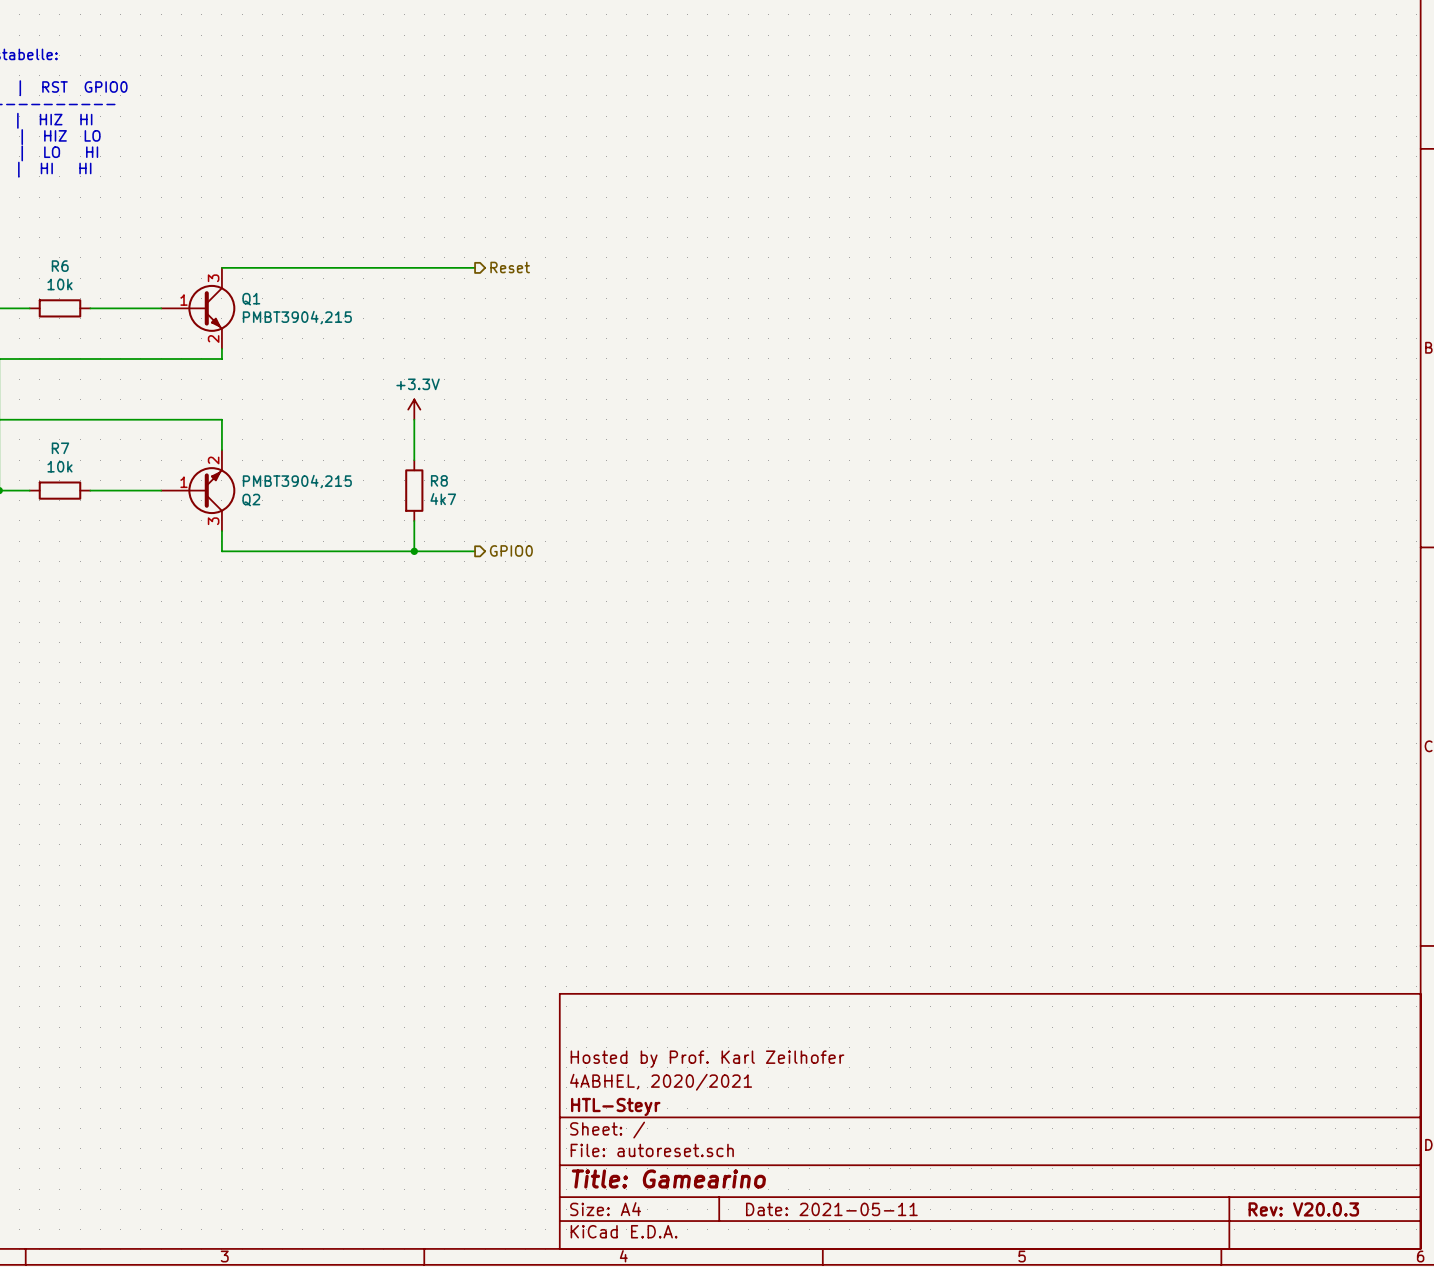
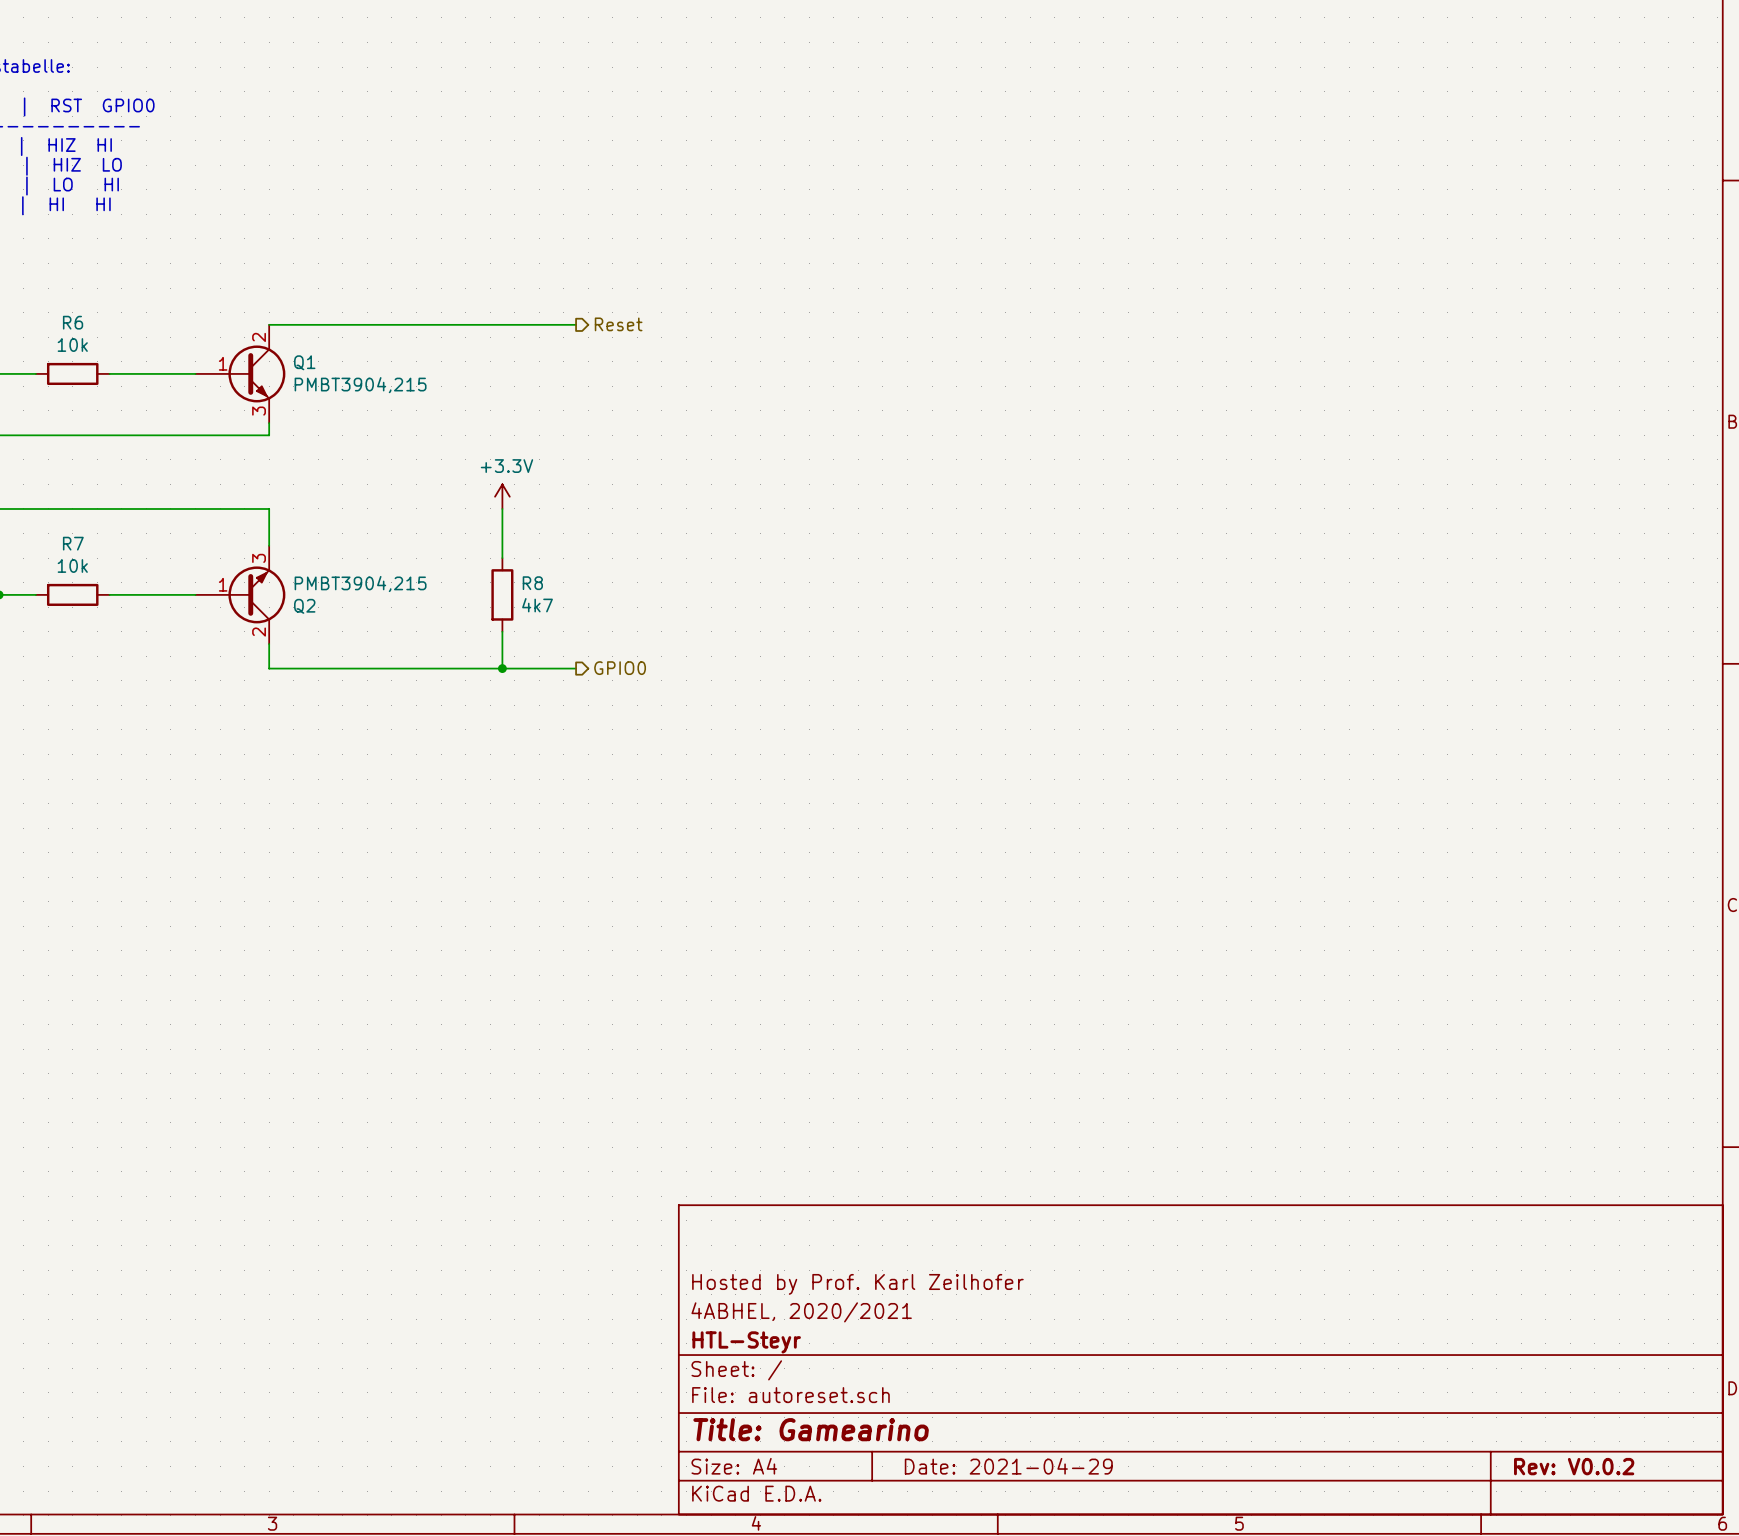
Q1 pin number: 3 (213, 278) -> 2 (259, 337)
Q1 pin number: 2 (213, 338) -> 3 (259, 411)
Q2 pin number: 2 (213, 460) -> 3 (259, 558)
Q2 pin number: 3 (213, 521) -> 2 (259, 632)
title block: Date: 2021-05-11 (831, 1209) -> Date: 2021-04-29 (1008, 1466)
title block: Rev: V20.0.3 (1303, 1209) -> Rev: V0.0.2 (1574, 1466)

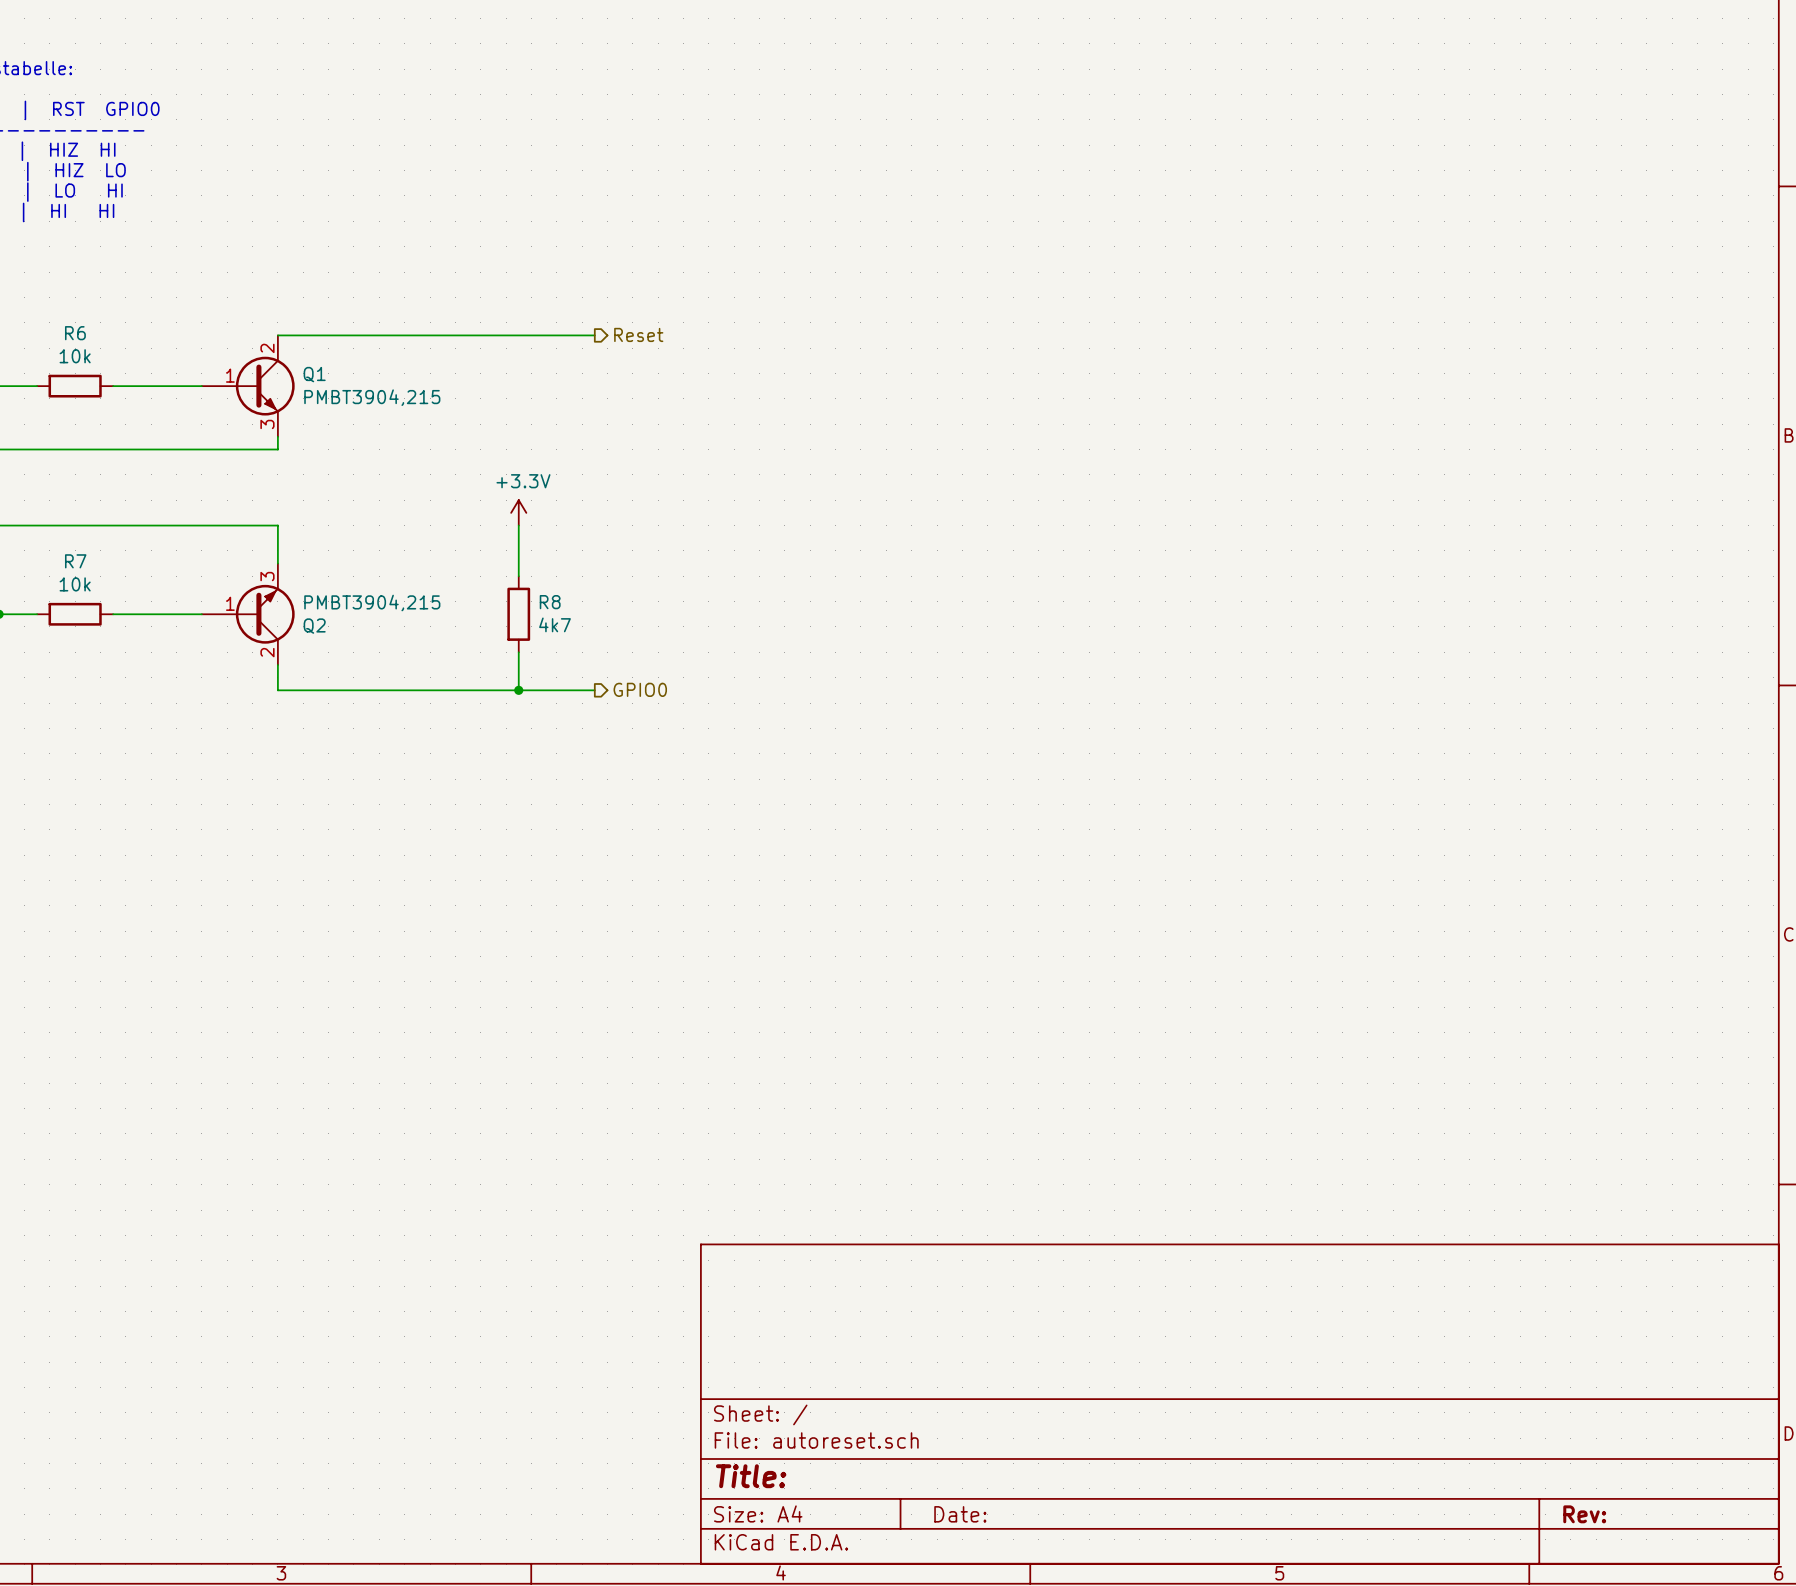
title block: Hosted by Prof. Karl Zeilhofer (857, 1284) -> none
title block: 4ABHEL, 2020/2021 (801, 1312) -> none
title block: HTL-Steyr (746, 1342) -> none
title block: Title: Gamearino (811, 1429) -> Title: (751, 1476)
title block: Date: 2021-04-29 (1008, 1466) -> Date: (960, 1514)
title block: Rev: V0.0.2 (1574, 1466) -> Rev: (1584, 1514)

